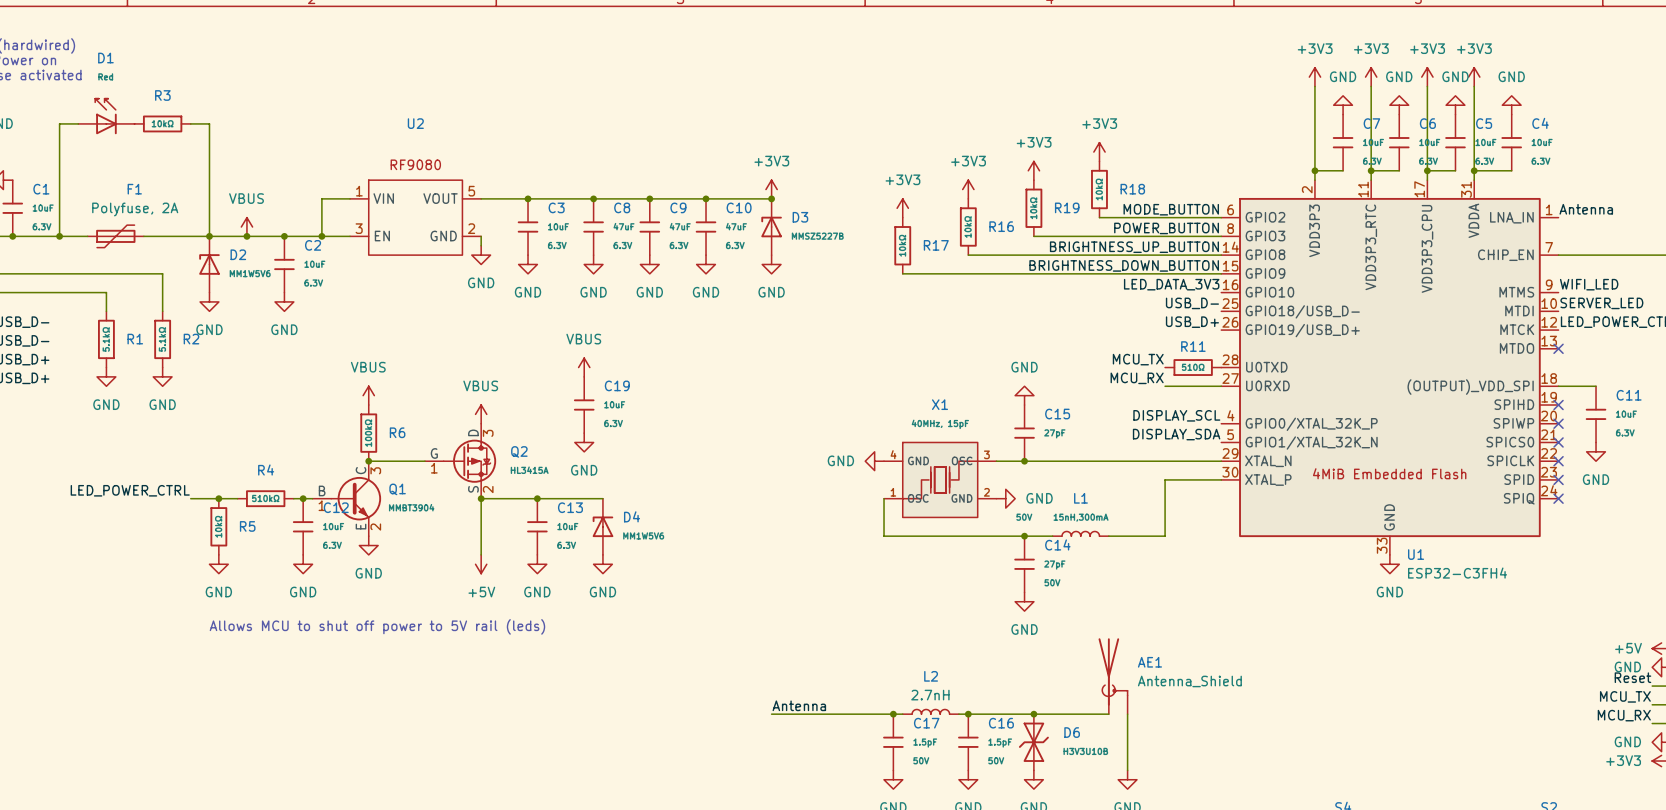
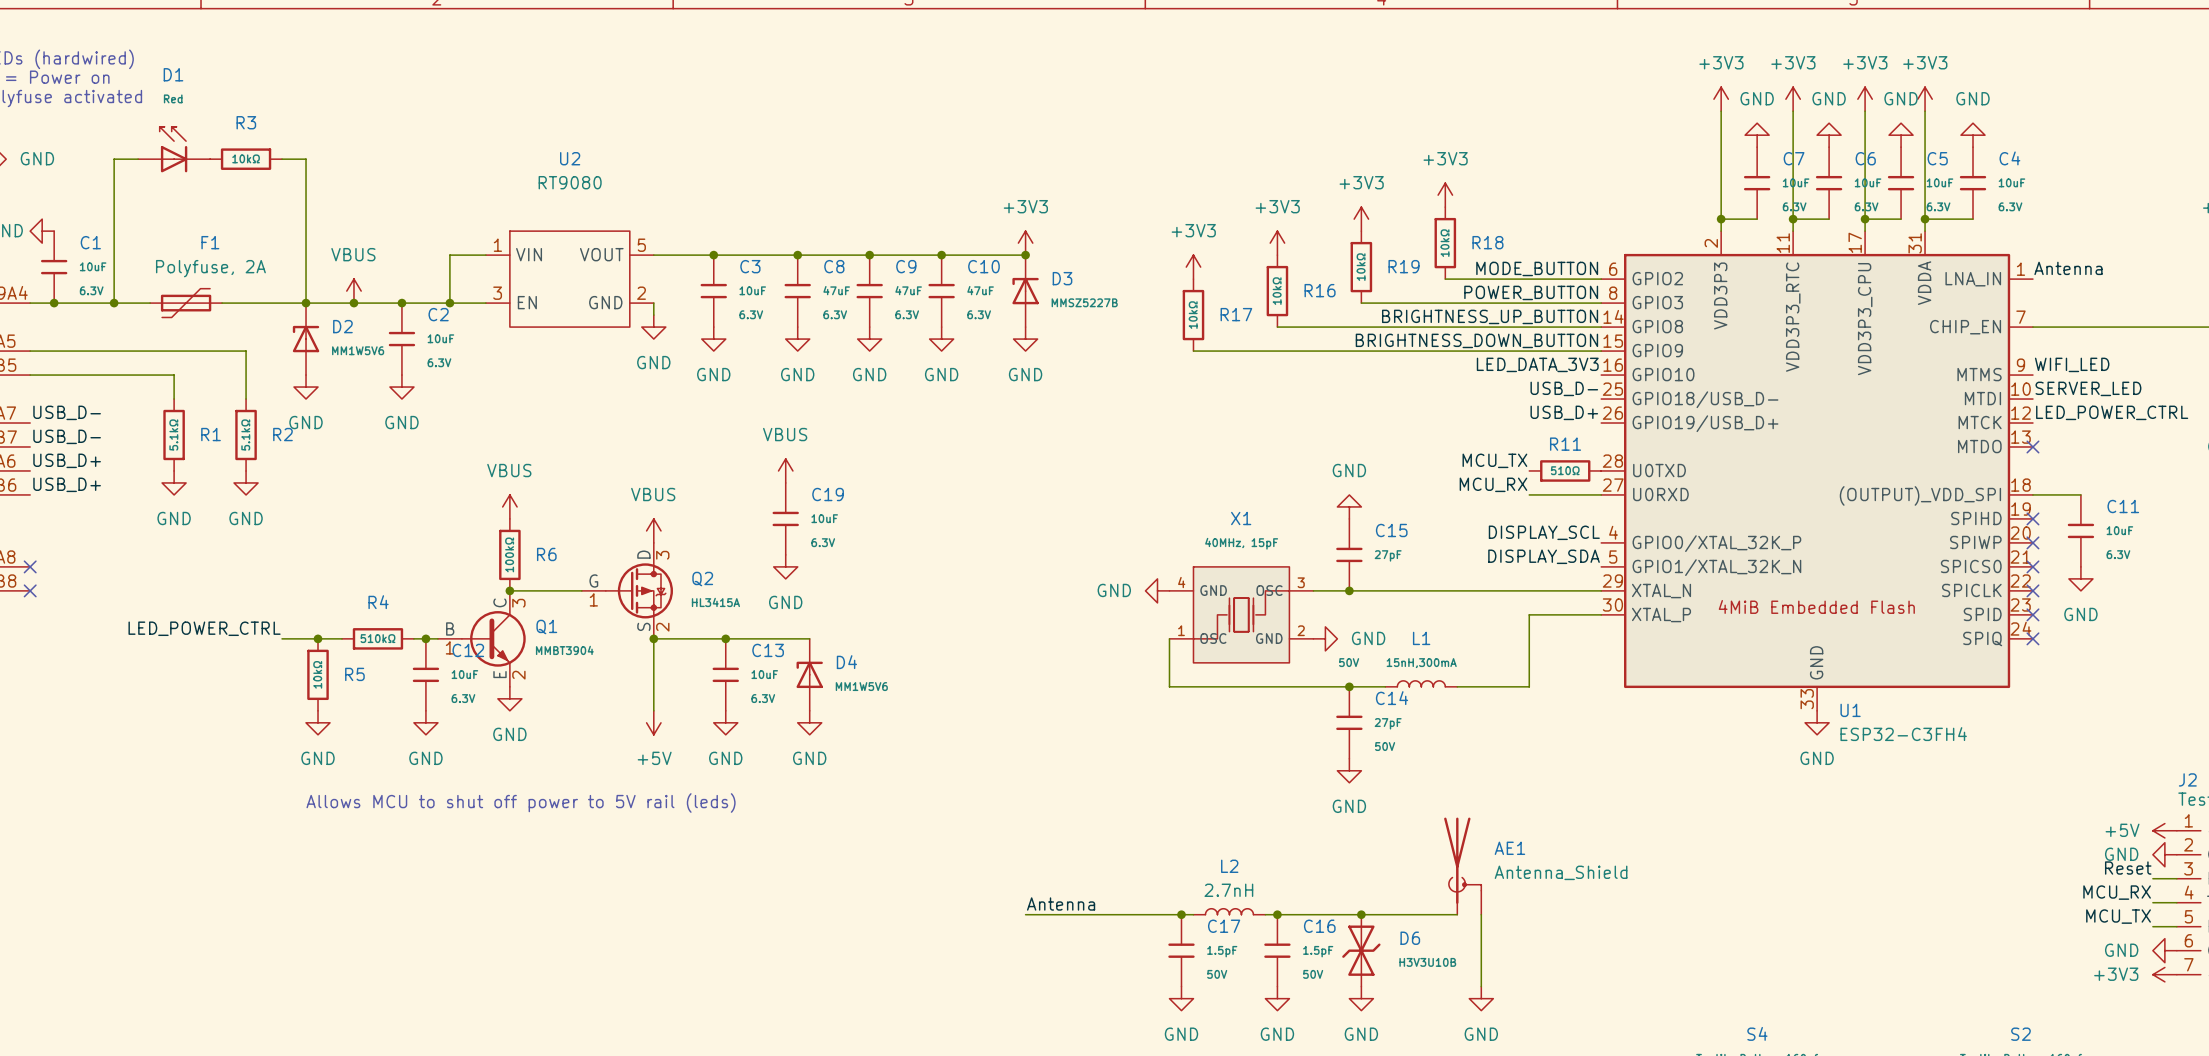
U2 value: none -> RT9080 (570, 182)
U2 text: RF9080 (415, 164) -> none
label: MCU_TX (1625, 696) -> MCU_RX (2117, 892)
label: MCU_RX (1624, 715) -> MCU_TX (2118, 916)

